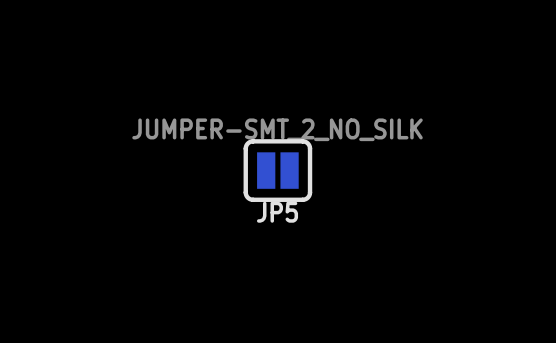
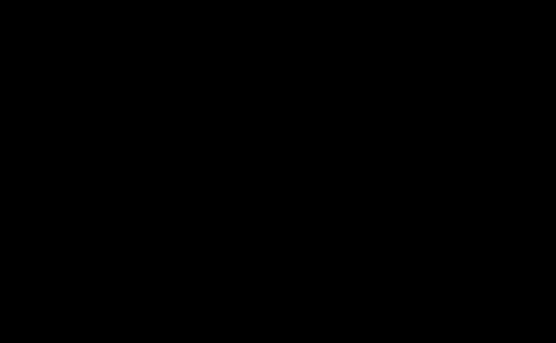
JP5: JUMPER-SMT_2_NO_SILK (277, 170) -> none

